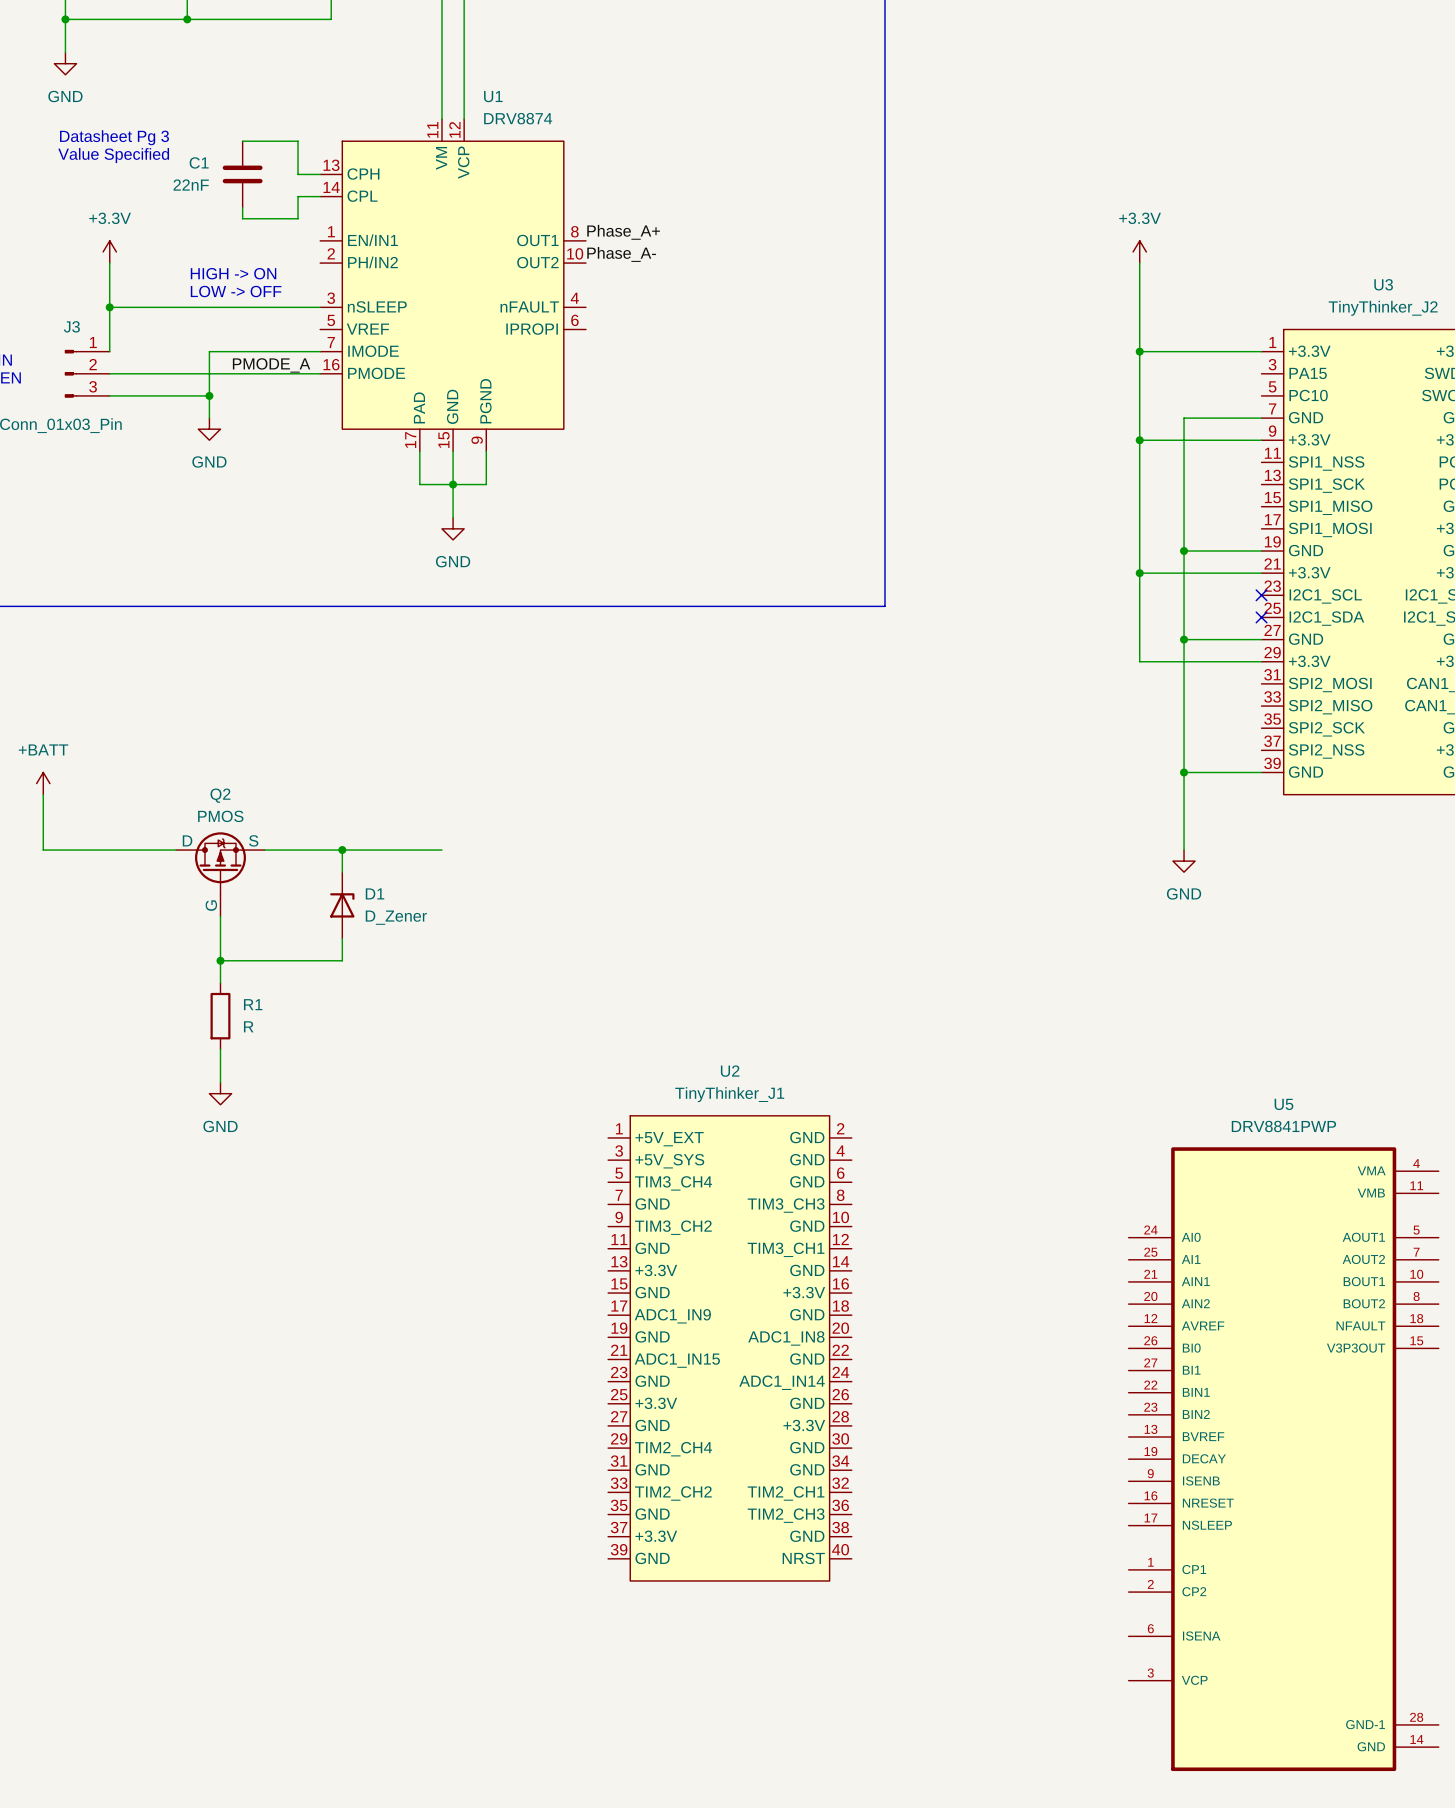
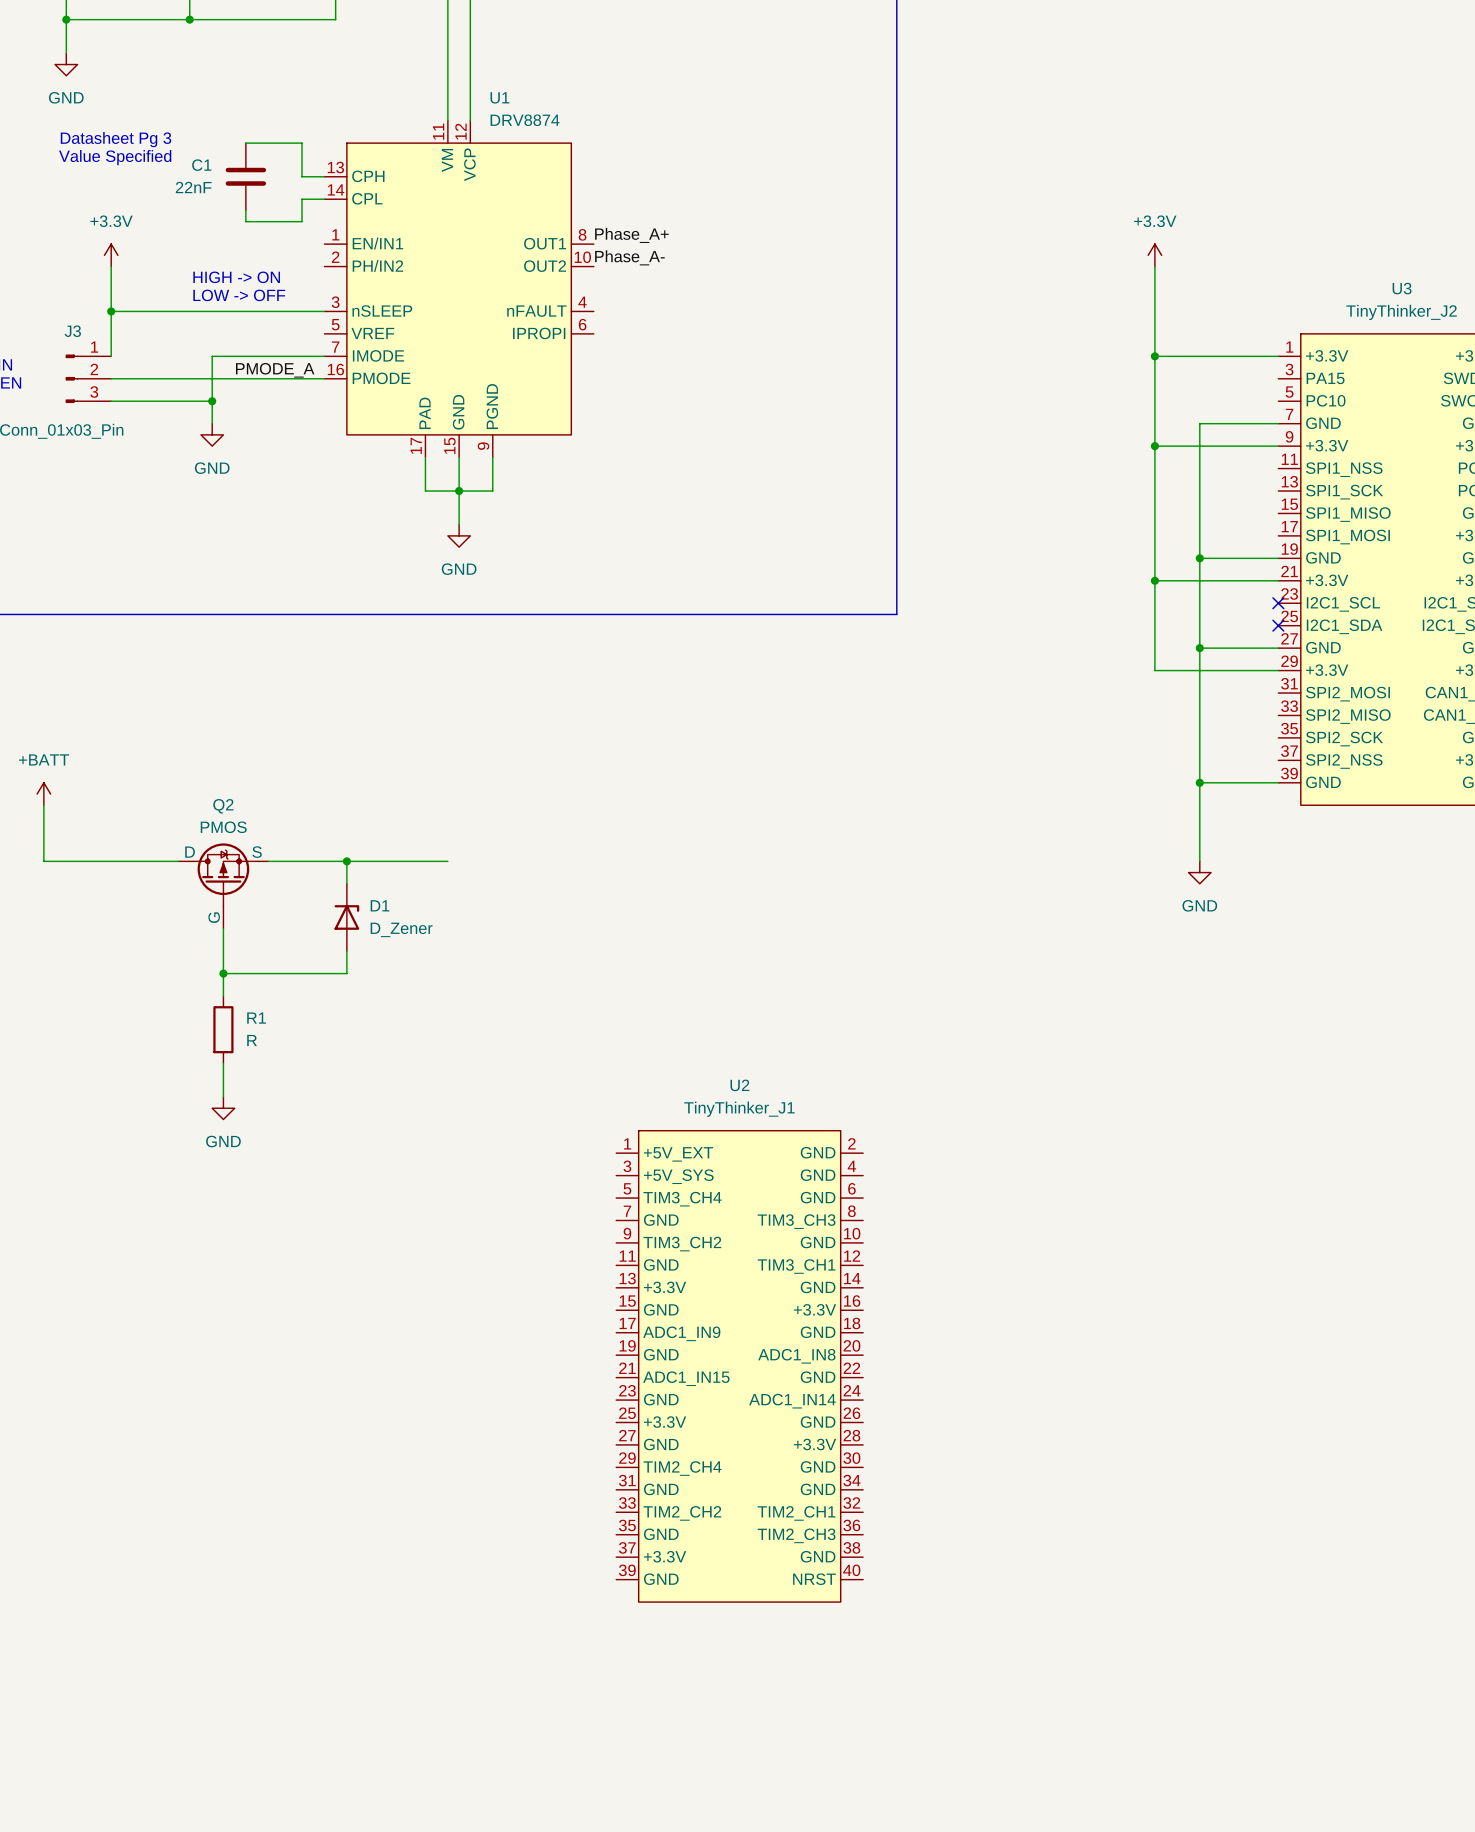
U5: DRV8841PWP (1283, 1459) -> none

